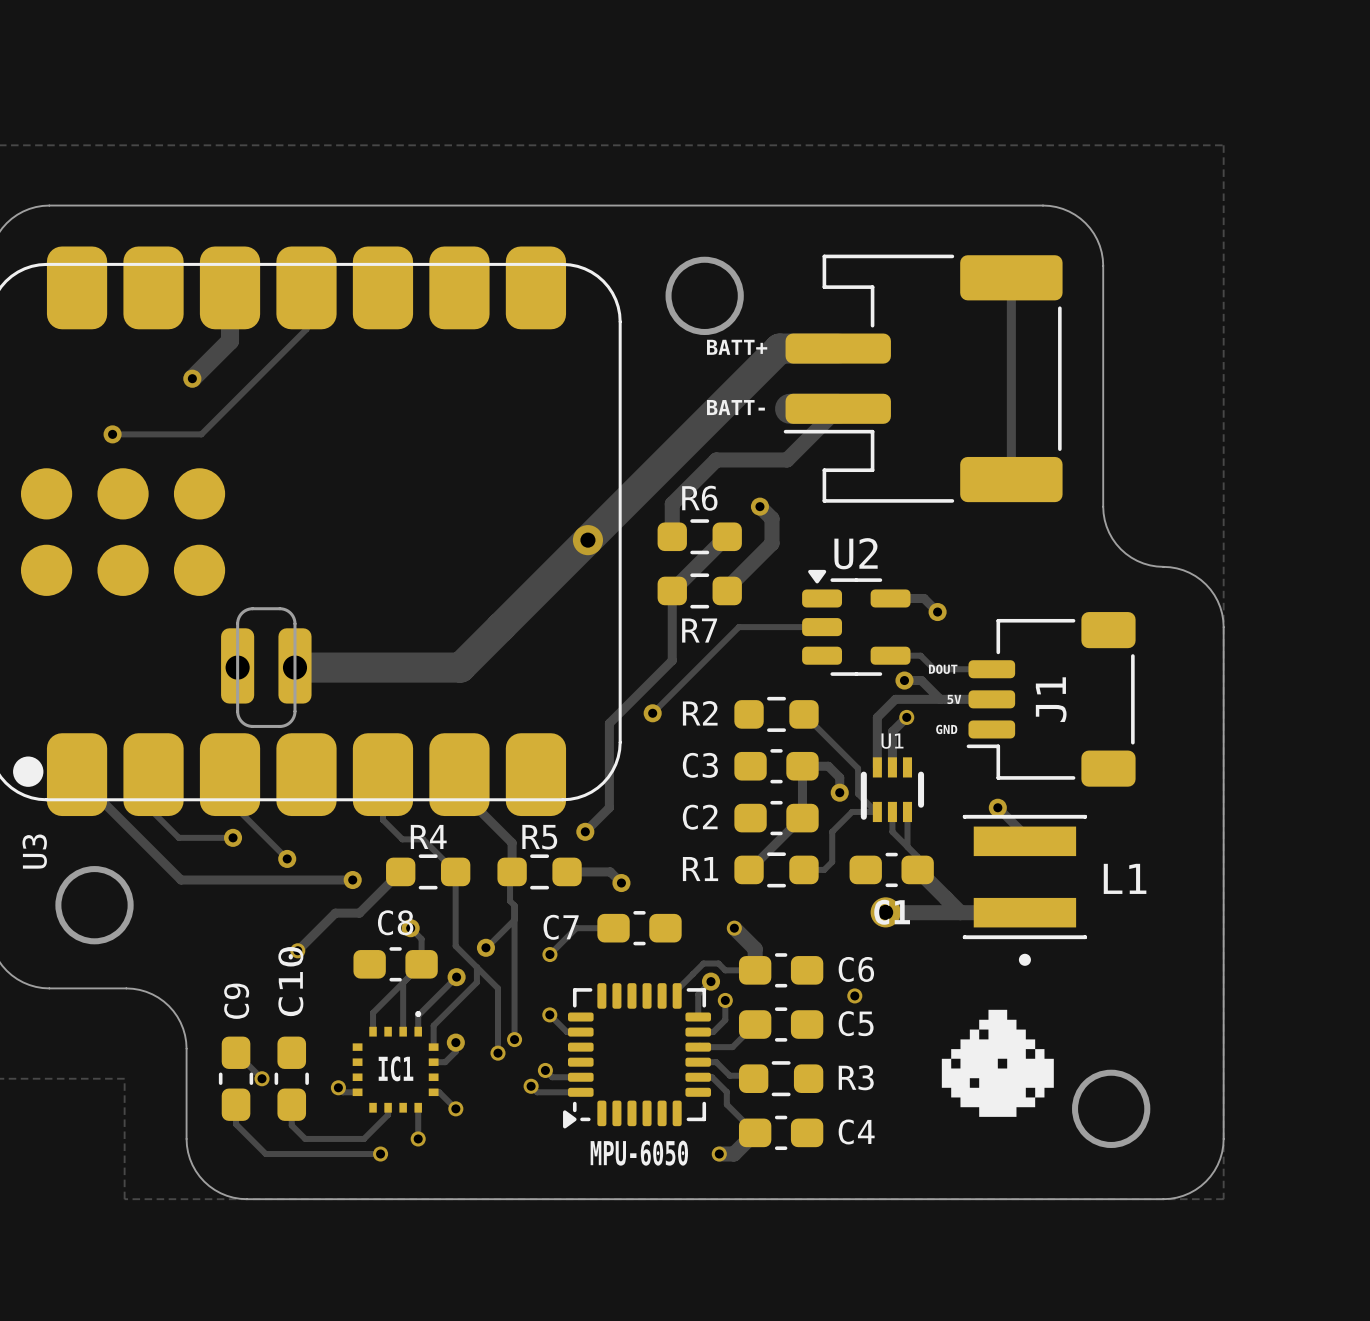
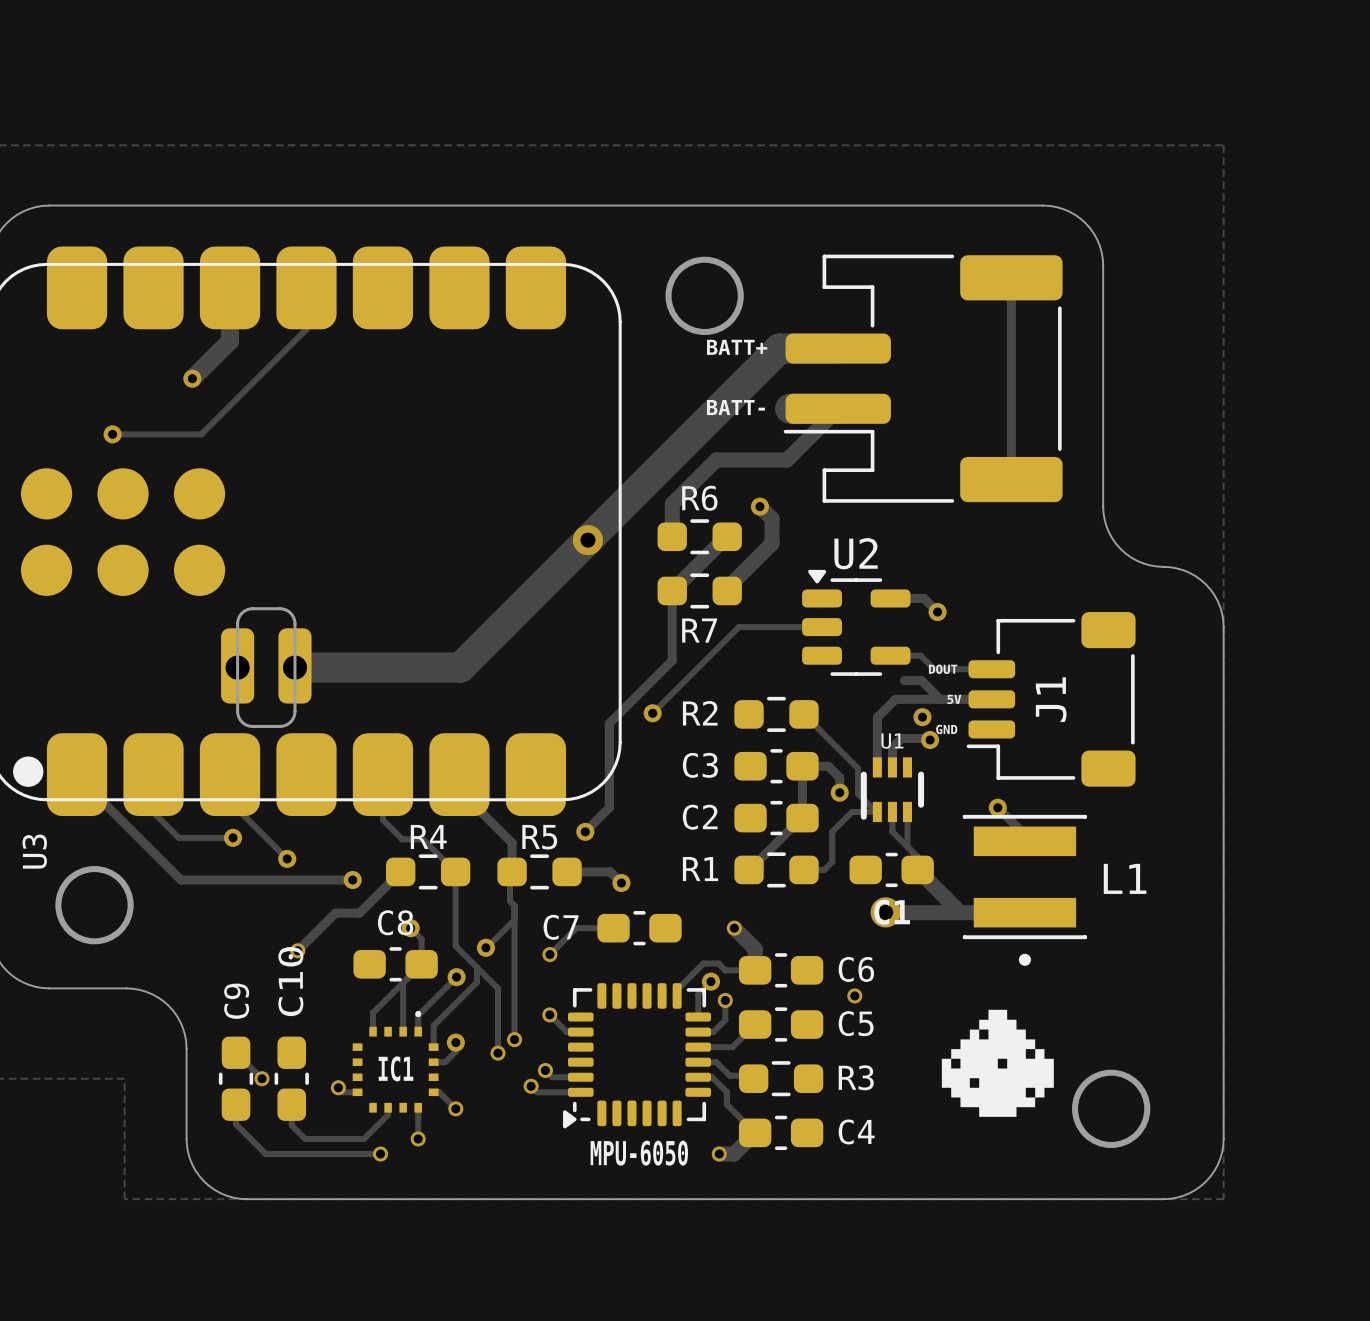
via: (904, 680) -> none
track: (906, 717) (892, 731) (892, 747) -> (930, 740) (901, 738) (892, 747)
via position: (906, 717) -> (922, 717)
via: none -> (930, 740)

